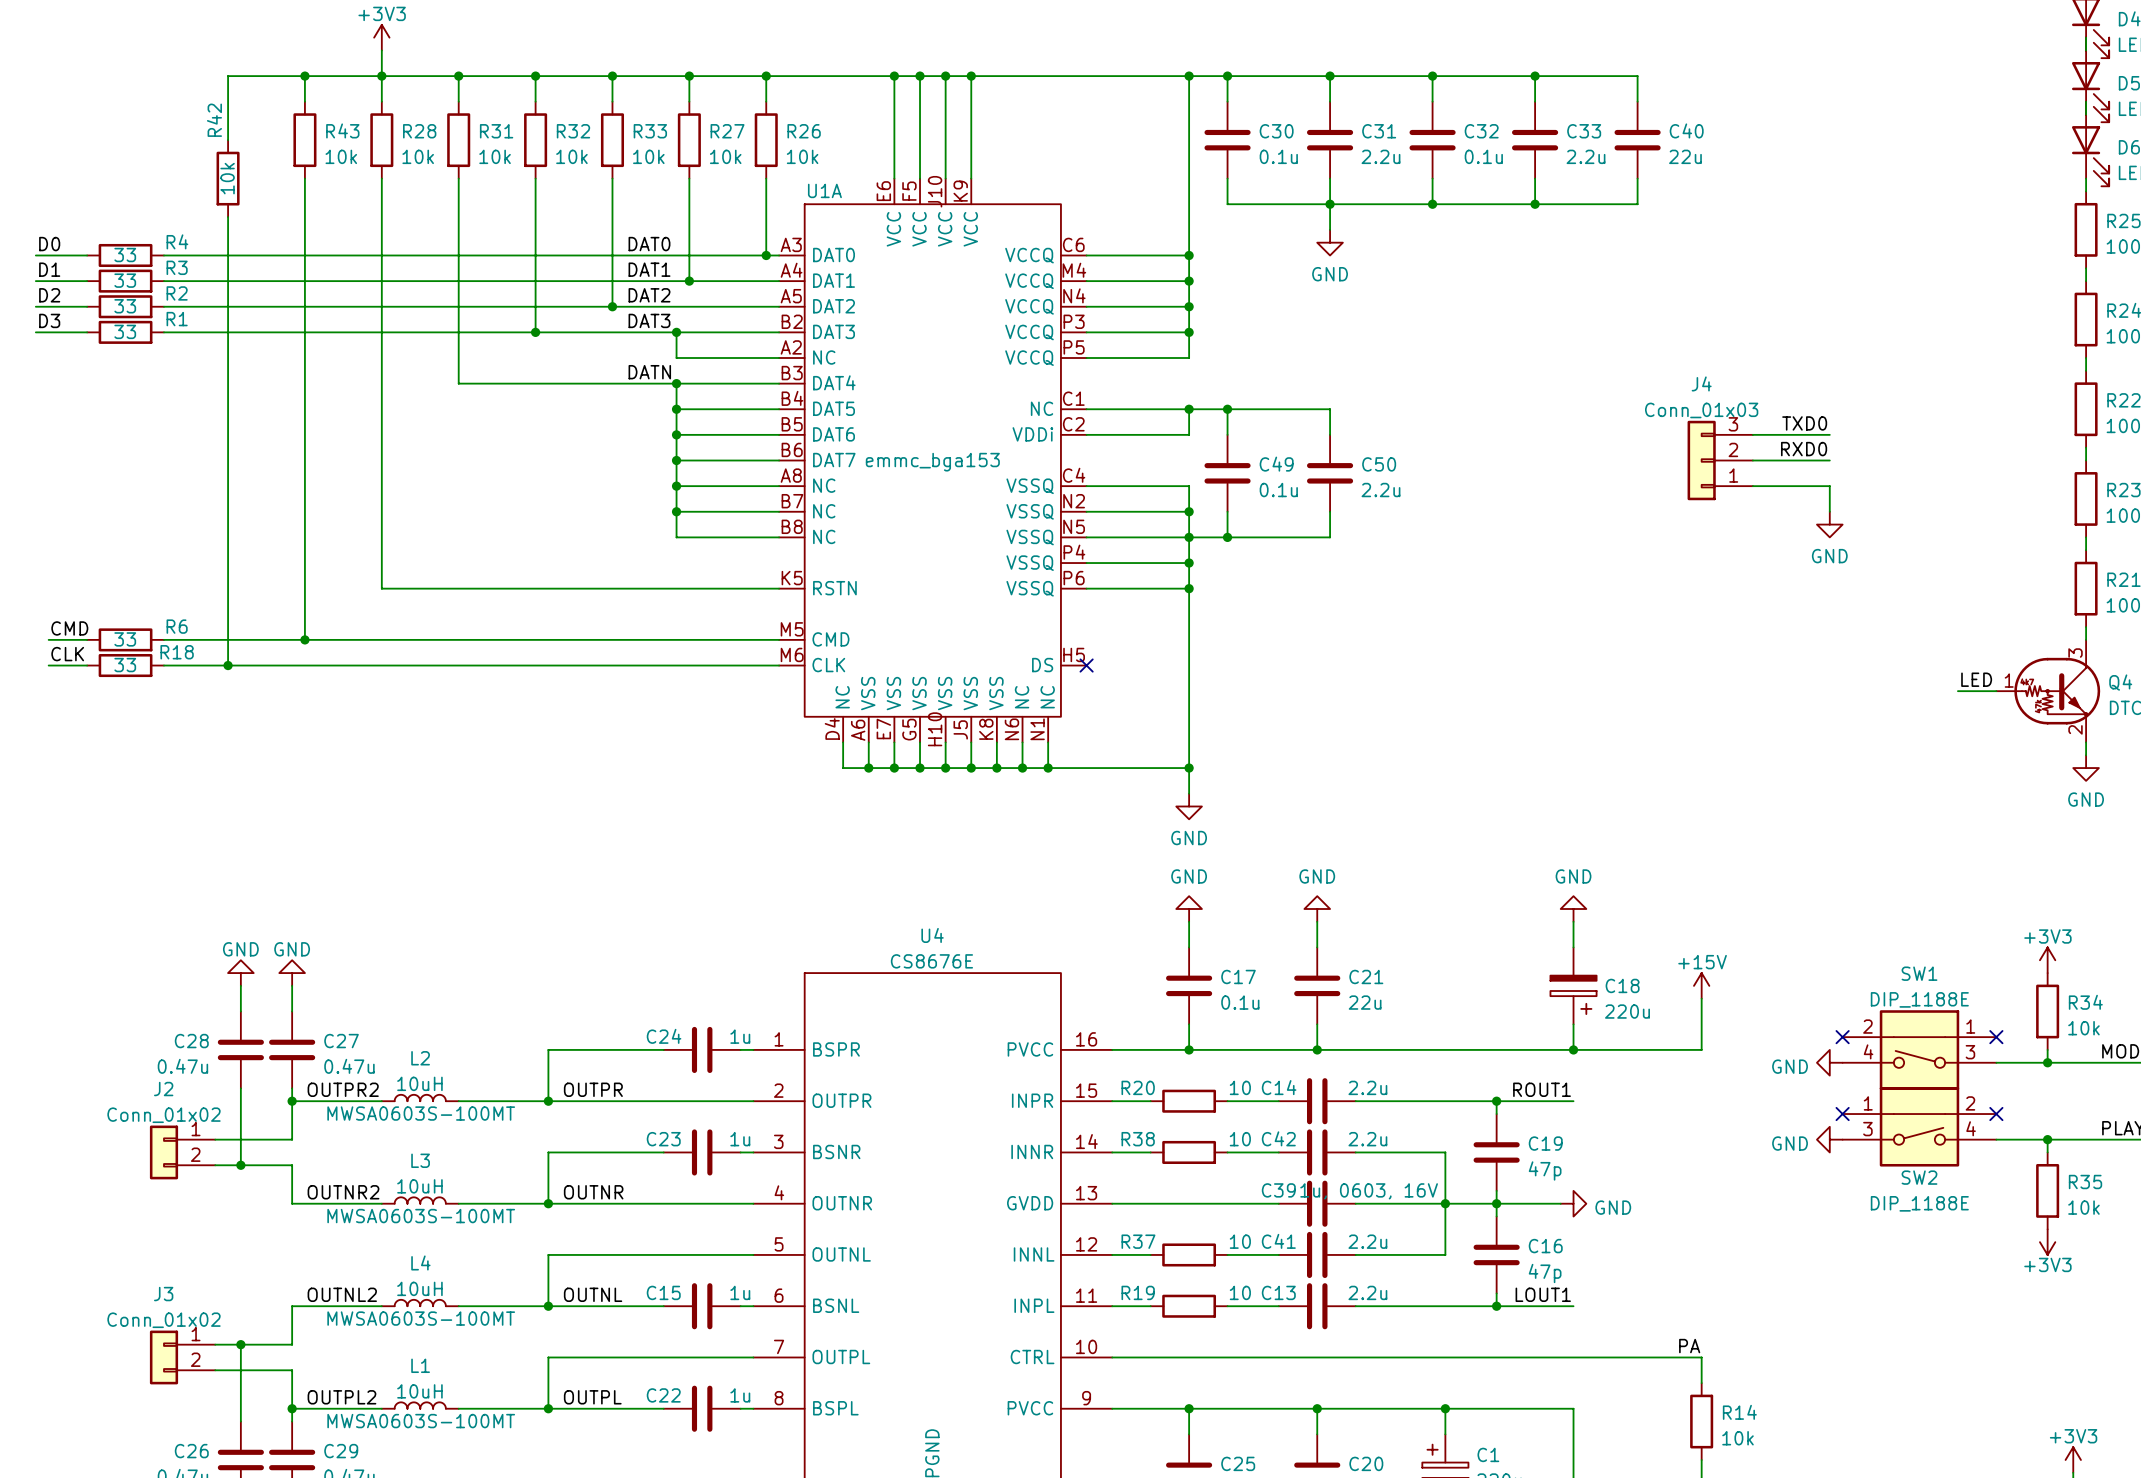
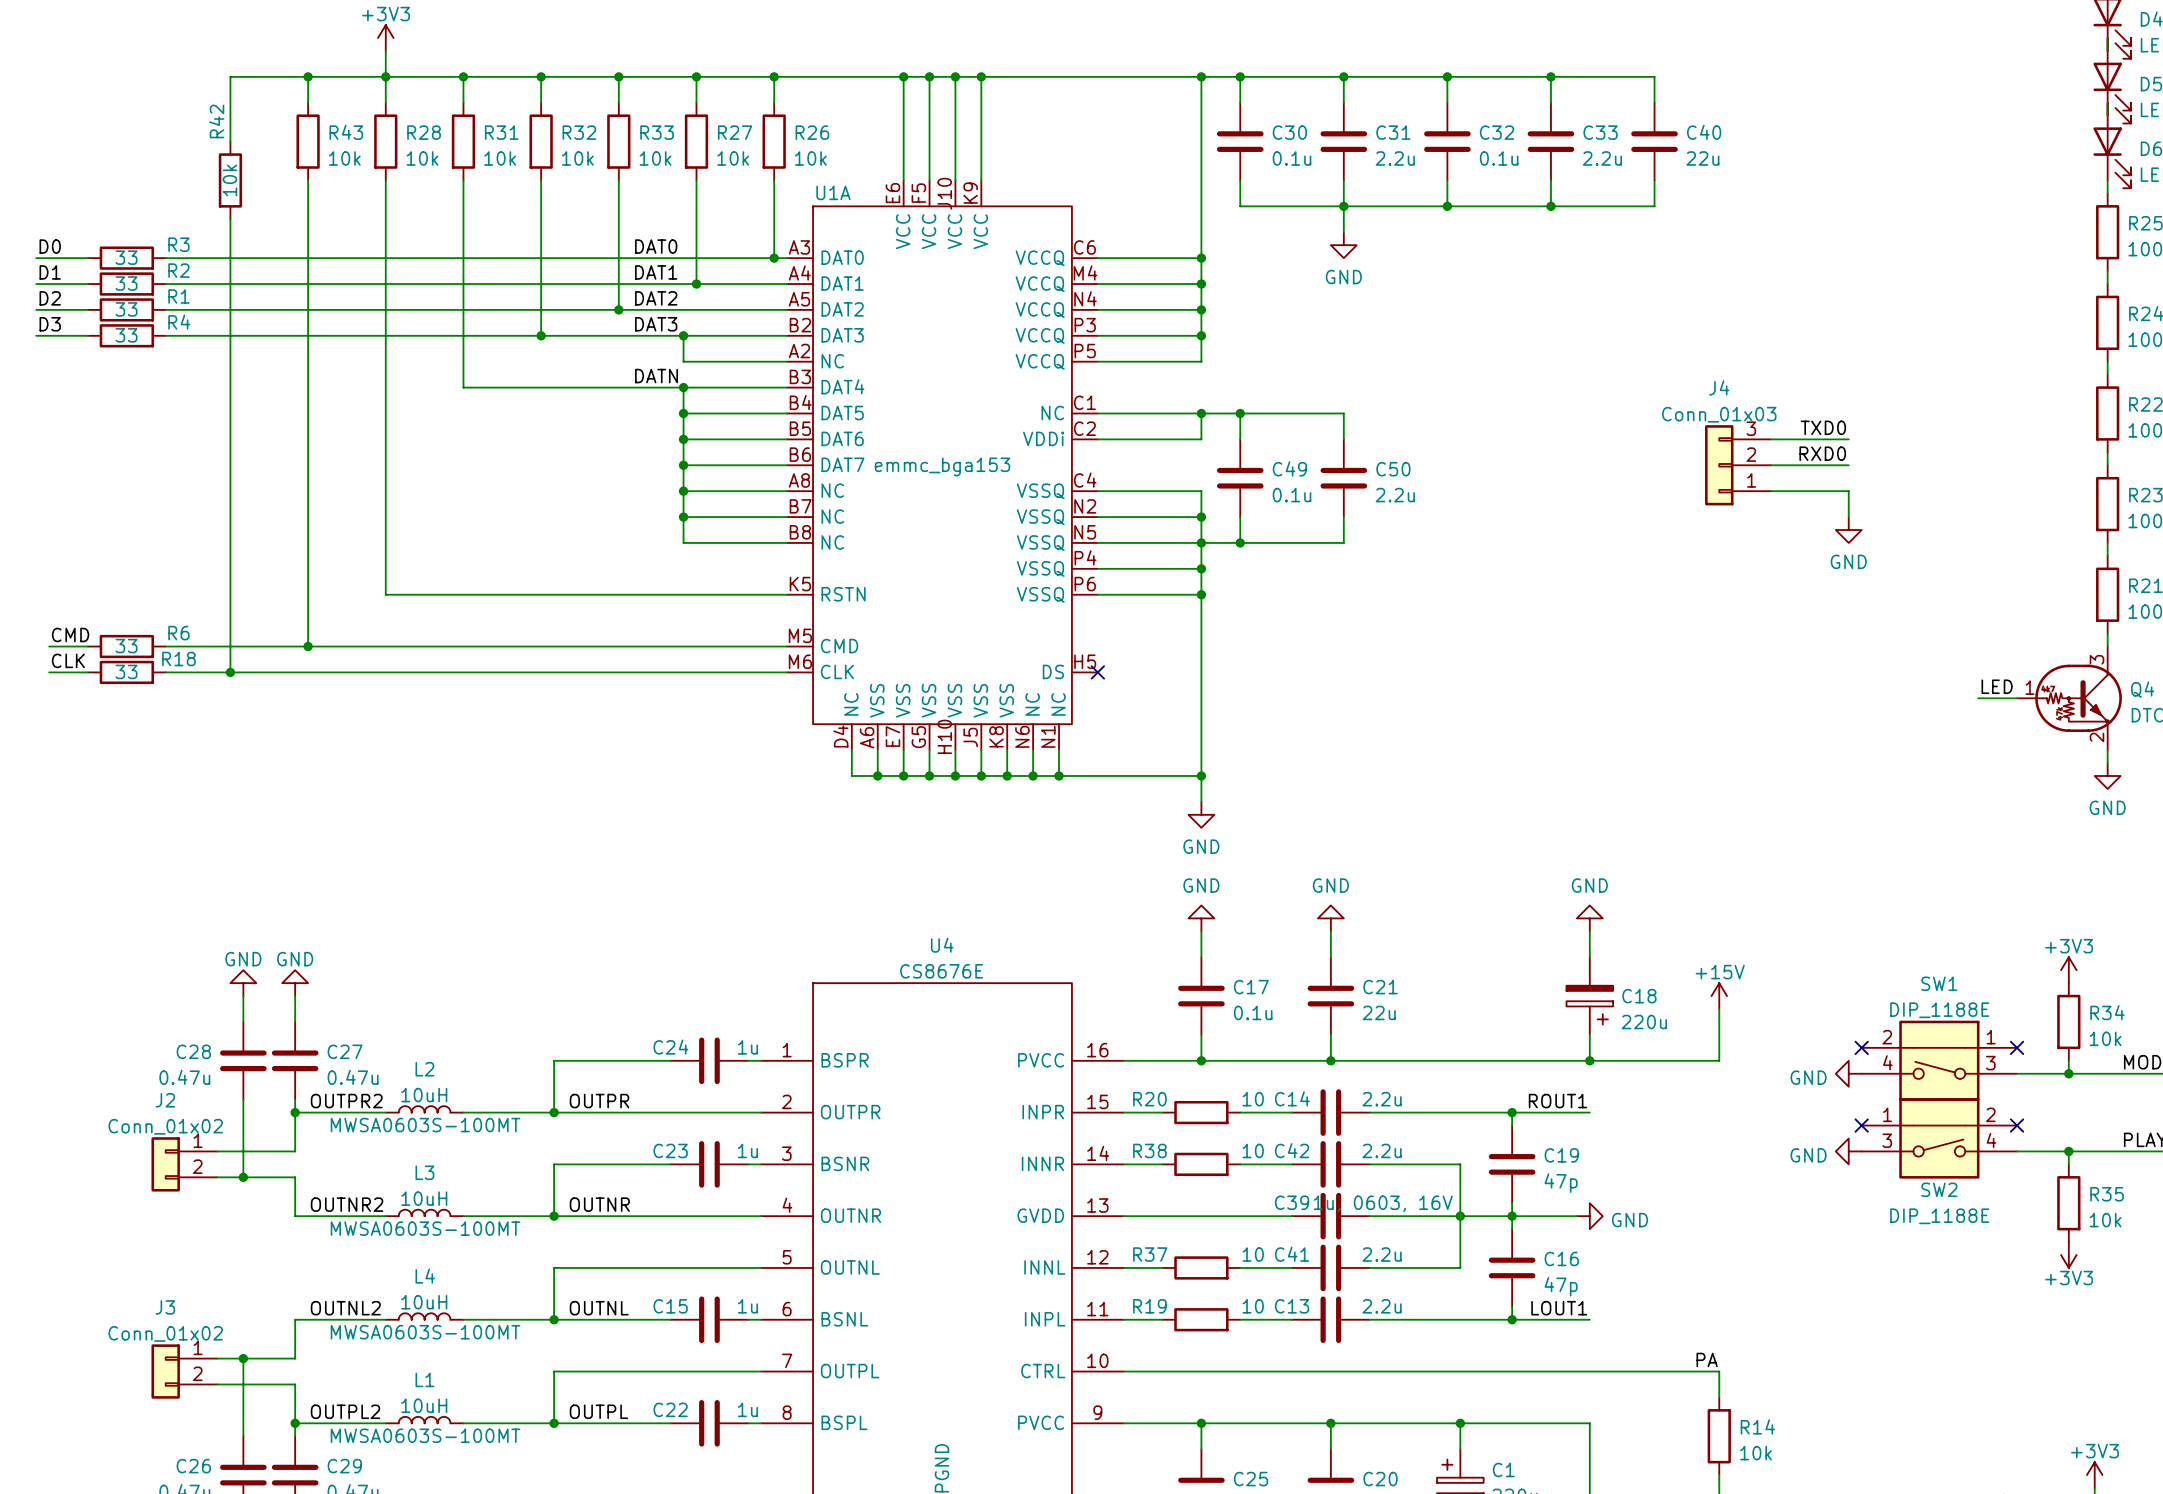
R4 name: R4 (177, 241) -> R3 (178, 244)
R3 name: R3 (177, 267) -> R2 (178, 270)
R2 name: R2 (177, 293) -> R1 (178, 296)
R1 name: R1 (177, 319) -> R4 (179, 322)

